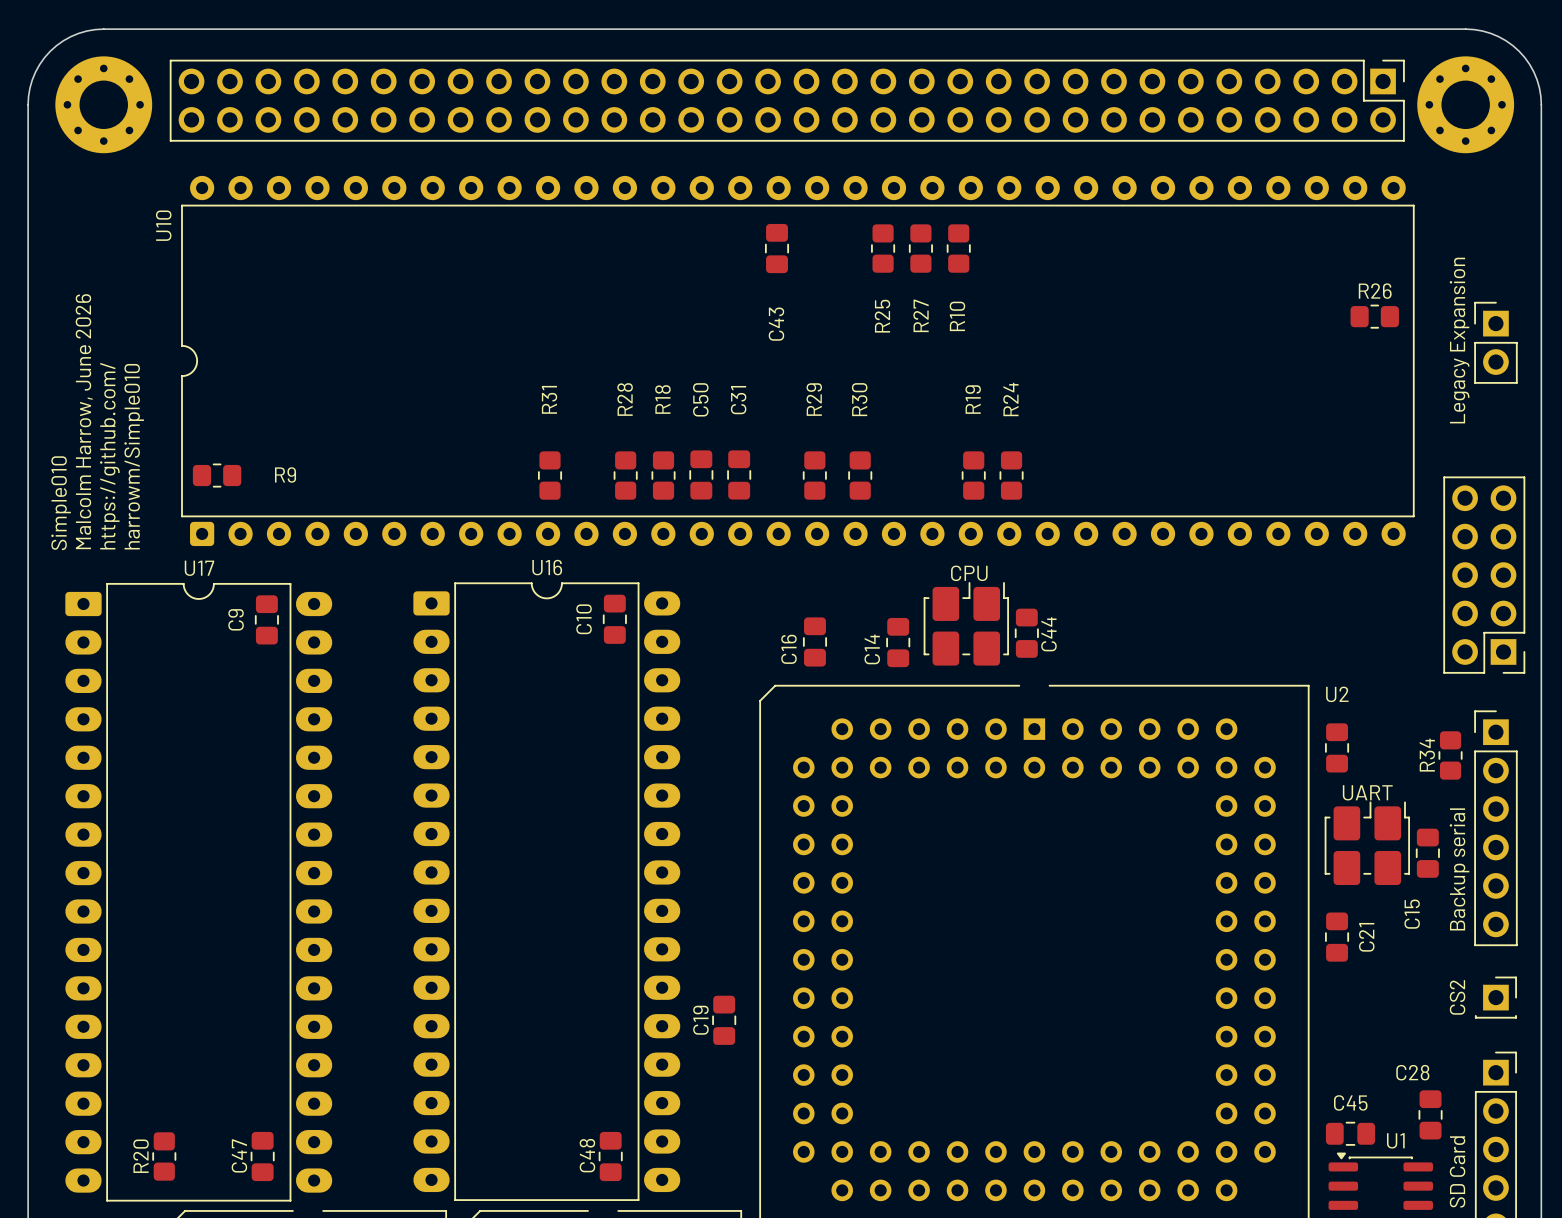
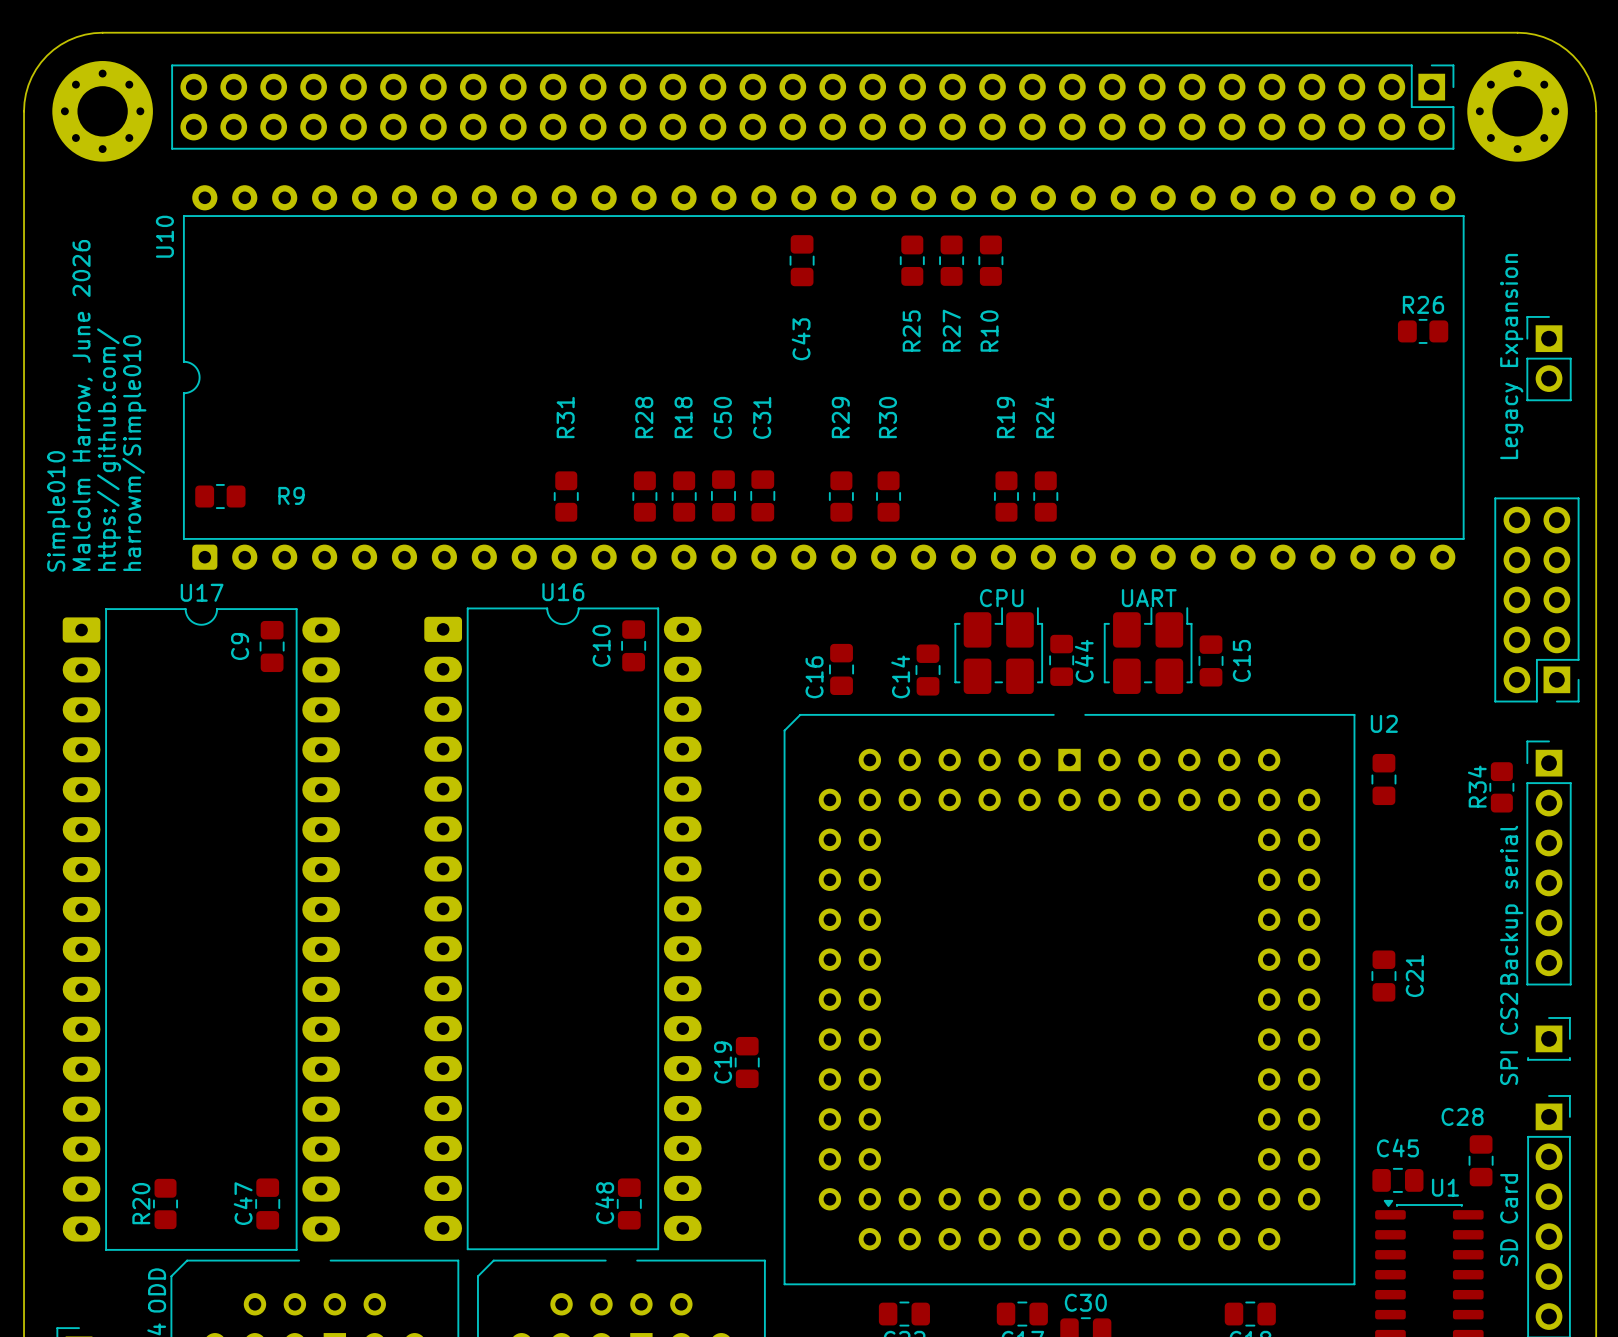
text position: UART (1367, 792) -> UART (1149, 598)
part position: (1367, 843) -> (1148, 650)
C15 position: (1427, 853) -> (1211, 660)
C15 name position: C15 (1412, 914) -> C15 (1241, 660)
part value: CS2 (1457, 997) -> SPI CS2 (1509, 1038)

